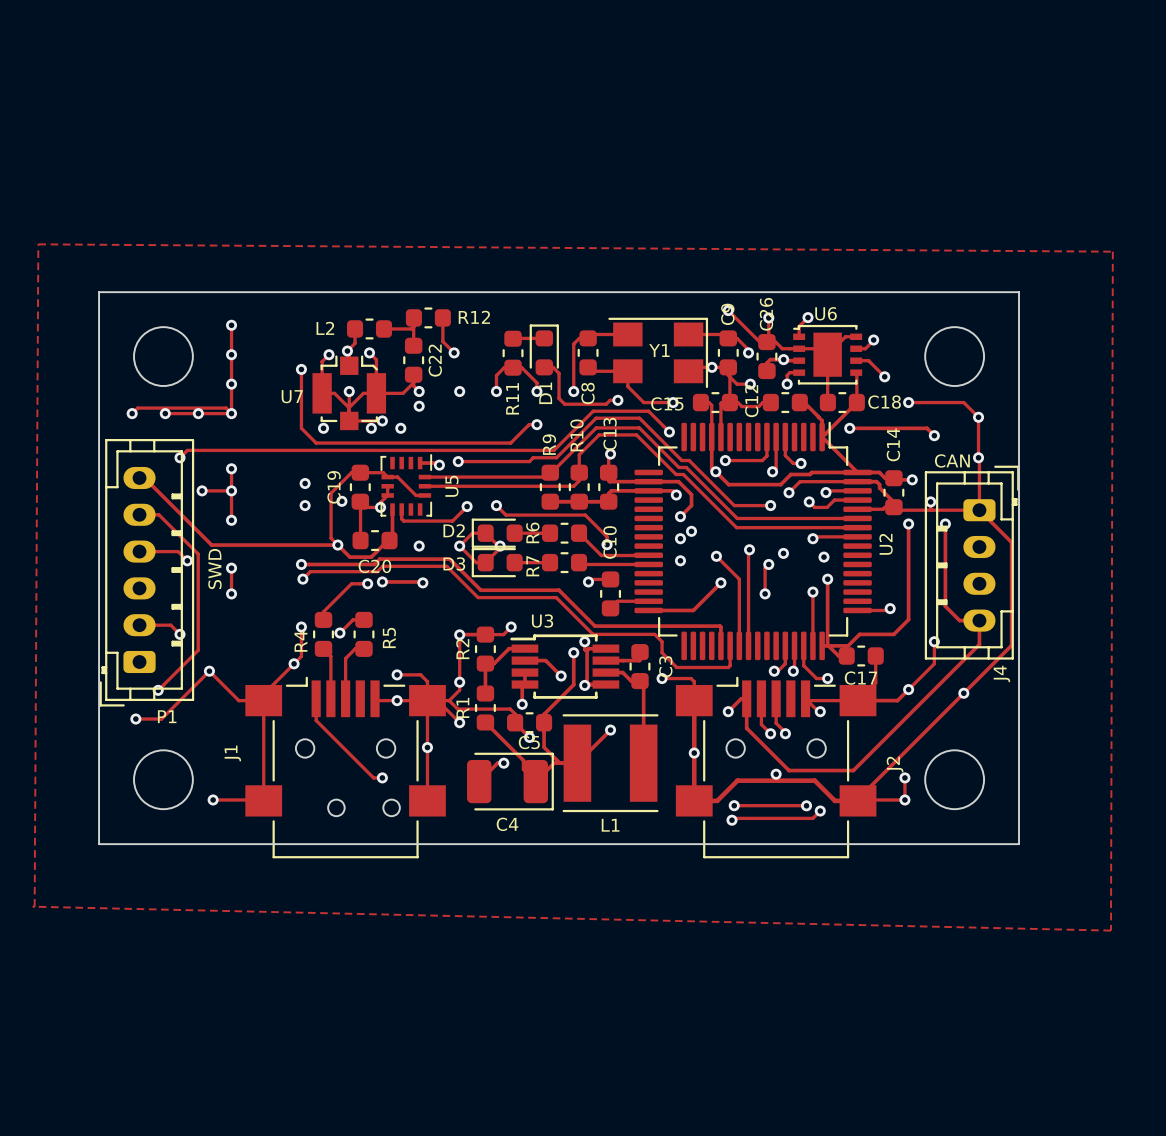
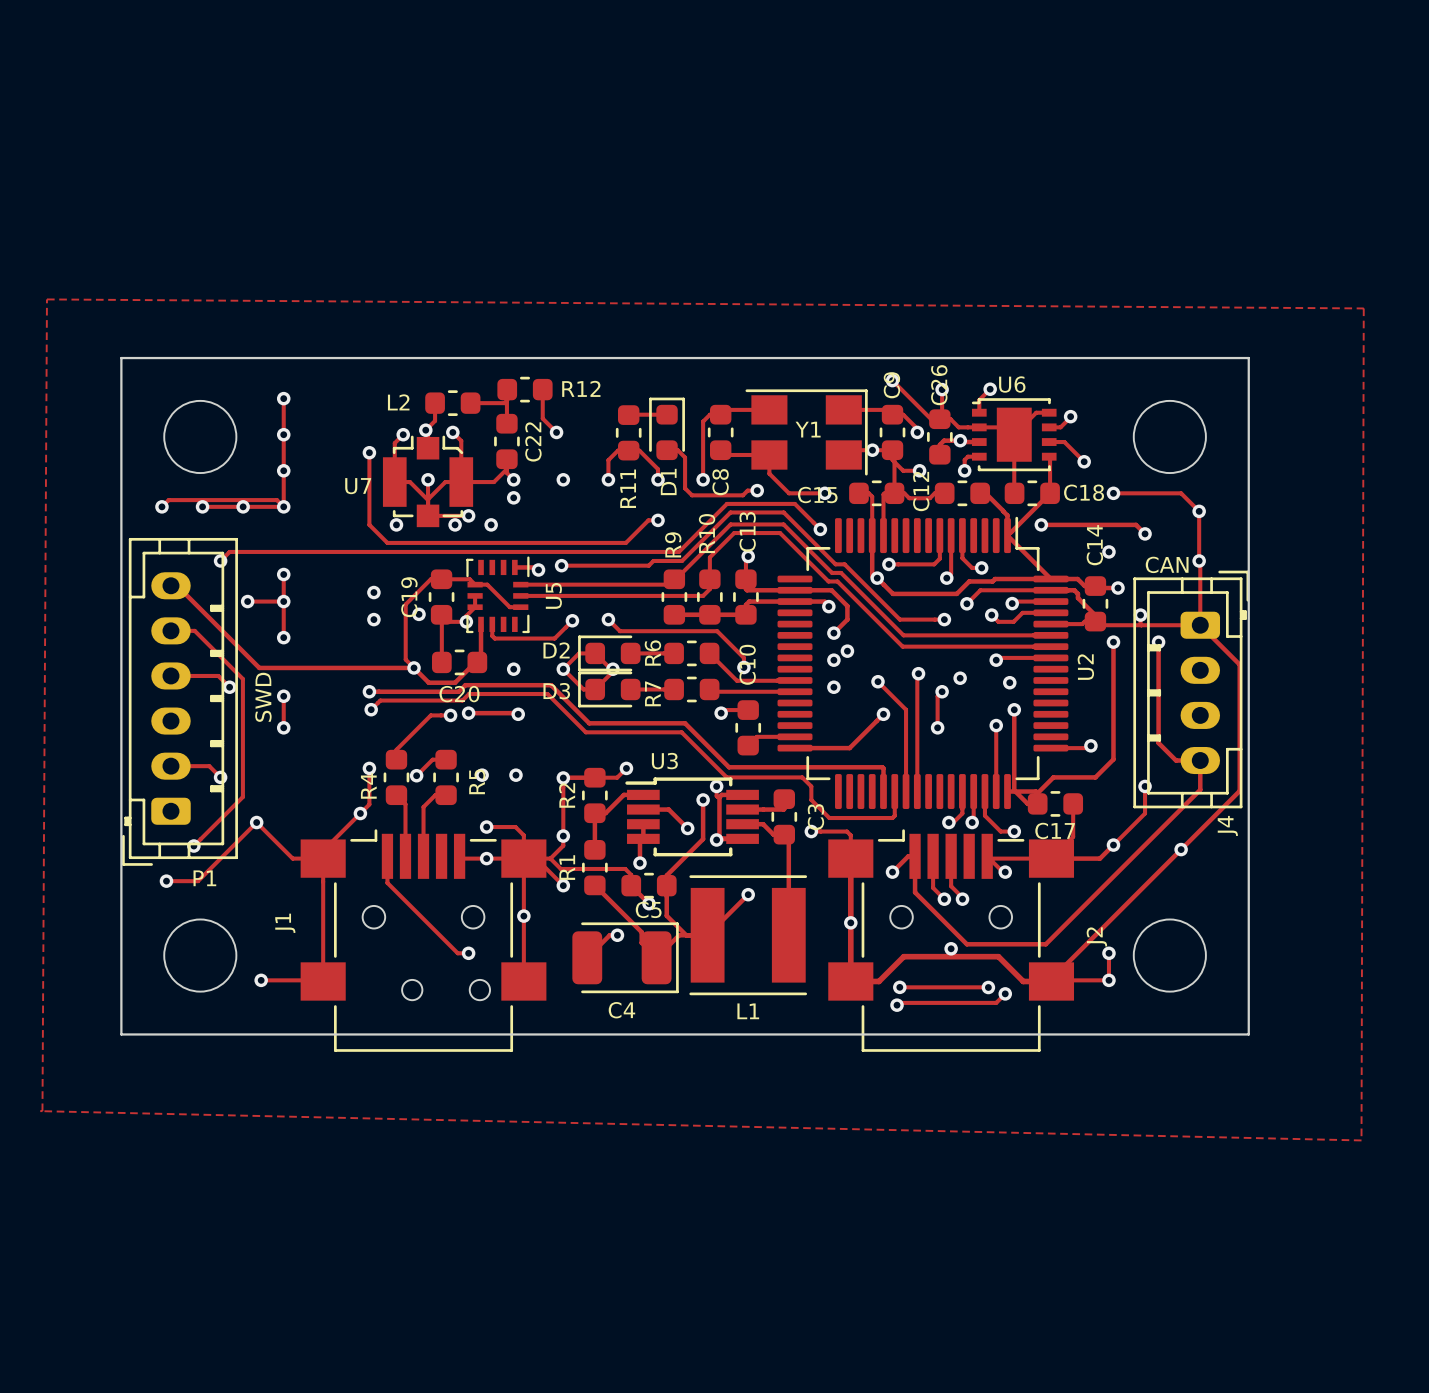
via: none -> (1108, 551)
via: none -> (482, 775)
via: none -> (515, 775)

